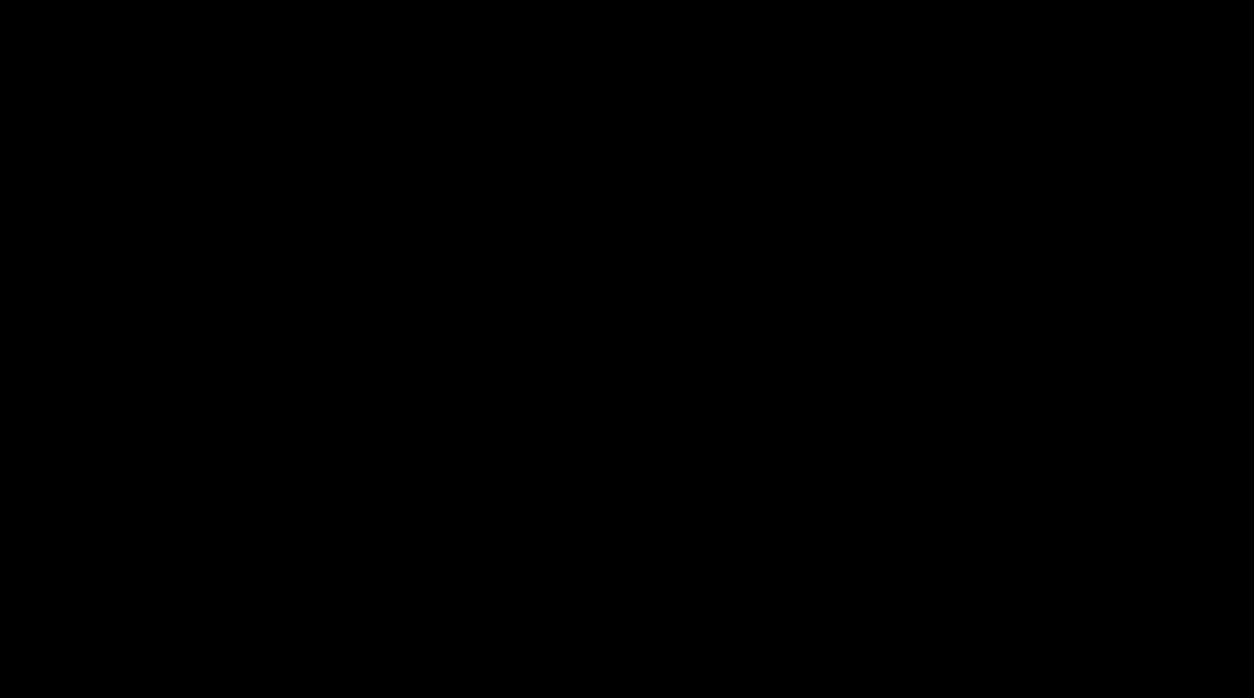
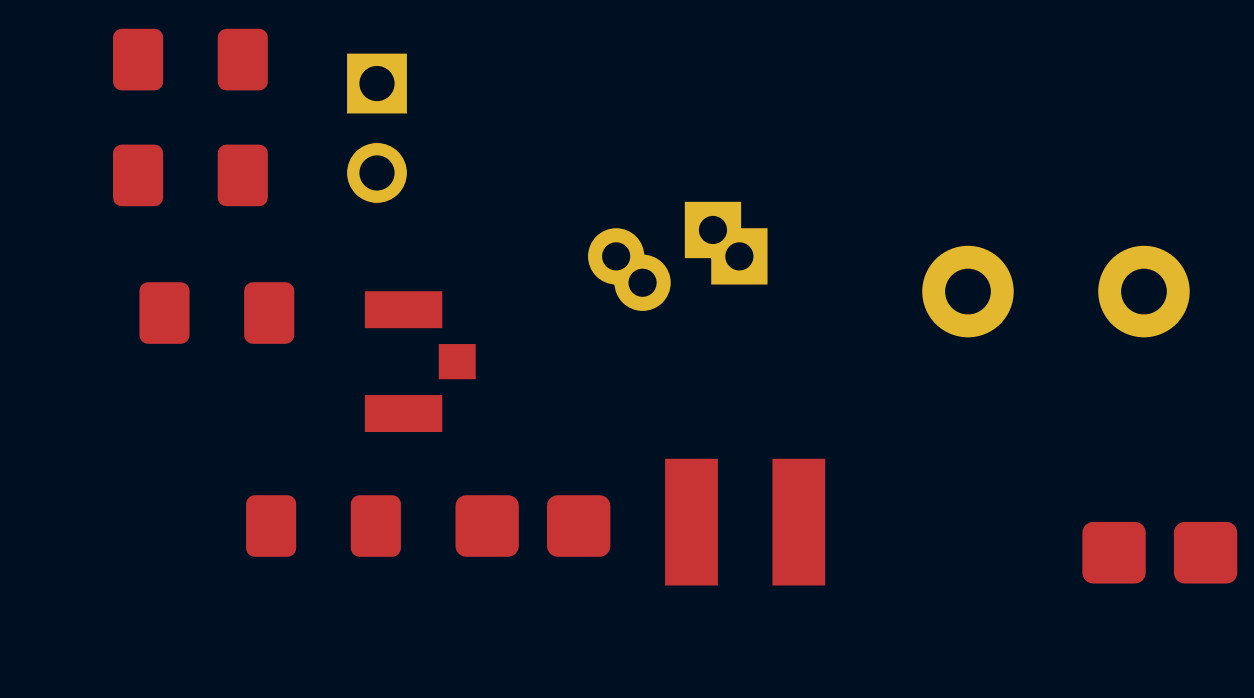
part: none -> (190, 59)
part: none -> (376, 128)
part: none -> (190, 175)
part: none -> (677, 256)
part: none -> (1055, 291)
part: none -> (216, 313)
part: none -> (420, 361)
part: none -> (745, 522)
part: none -> (323, 525)
part: none -> (532, 525)
part: none -> (1159, 552)

